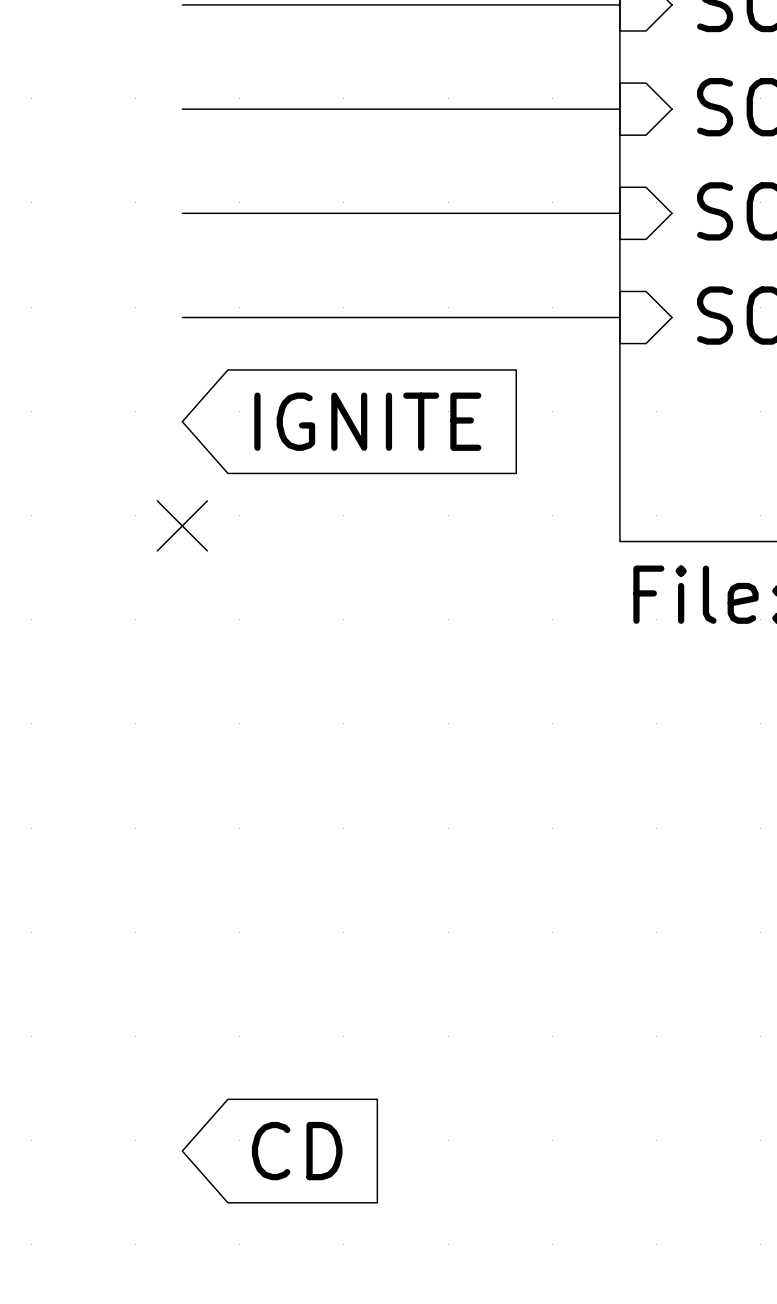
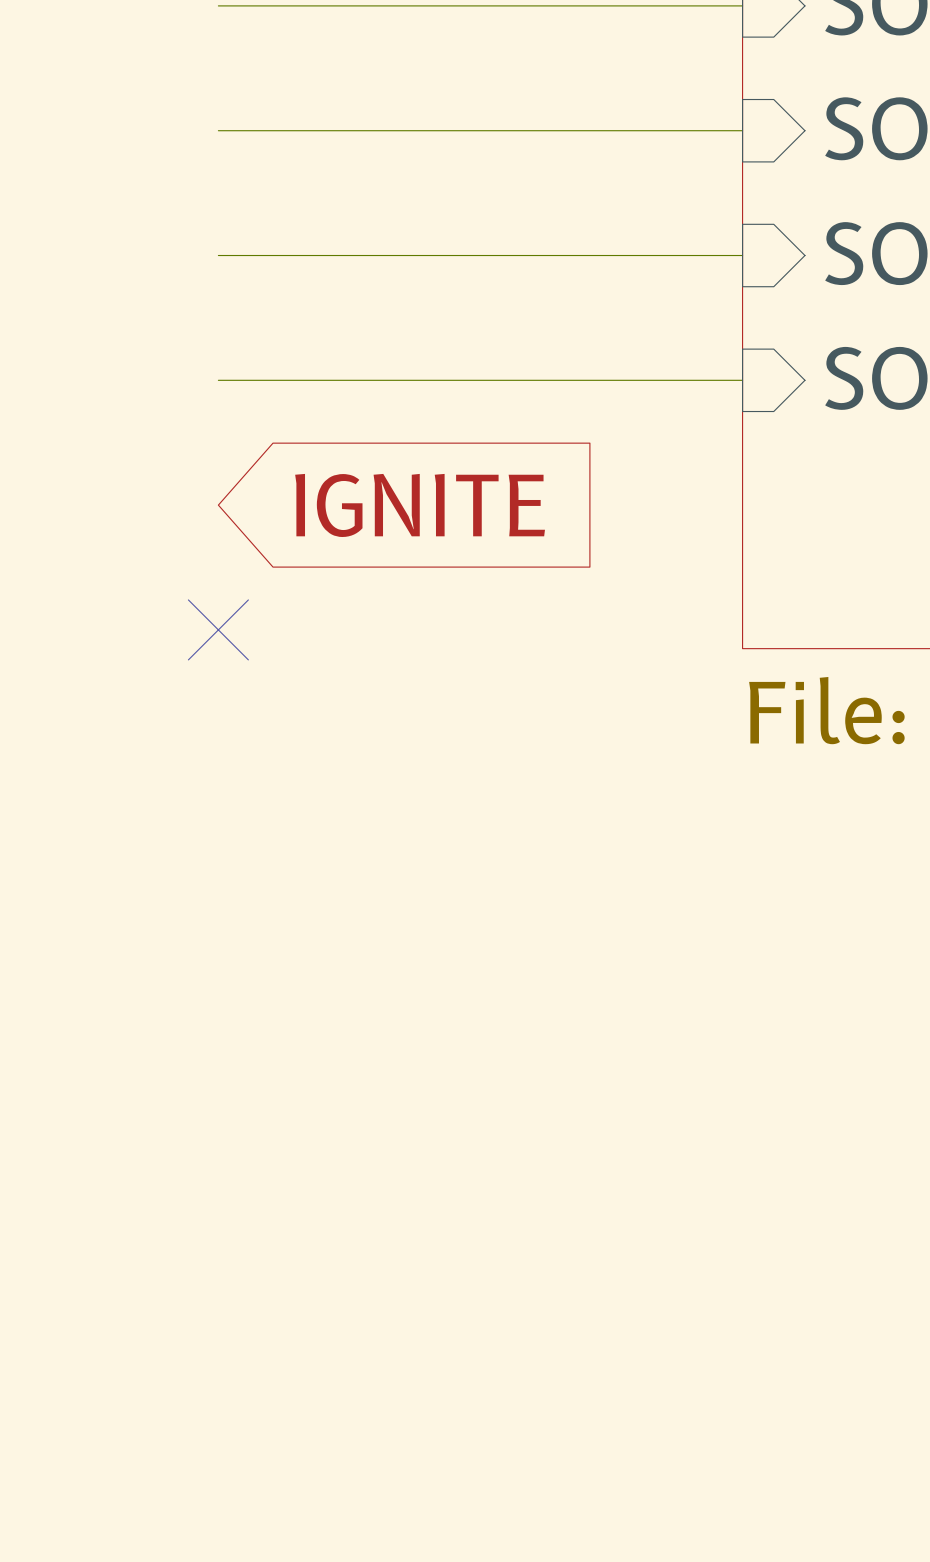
global label: CD (297, 1151) -> none

